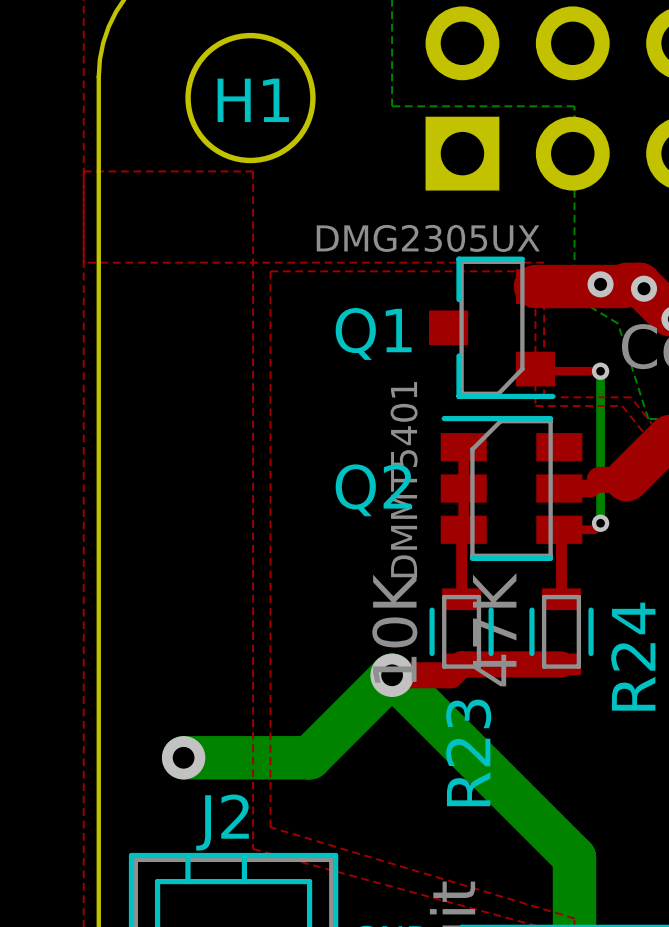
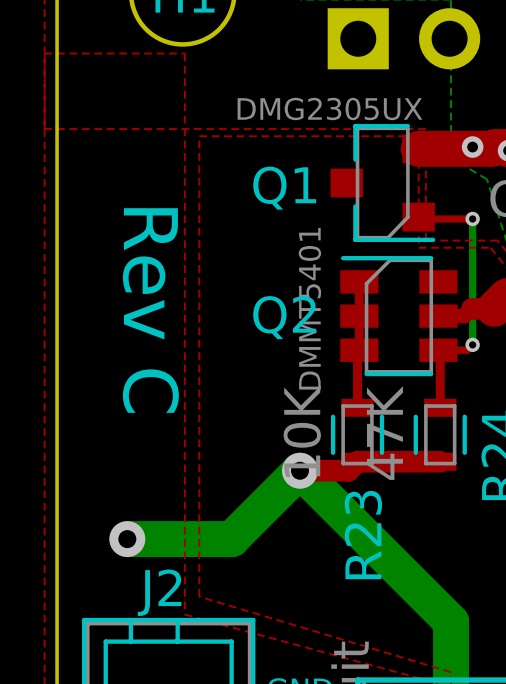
text: none -> Rev C (150, 310)

